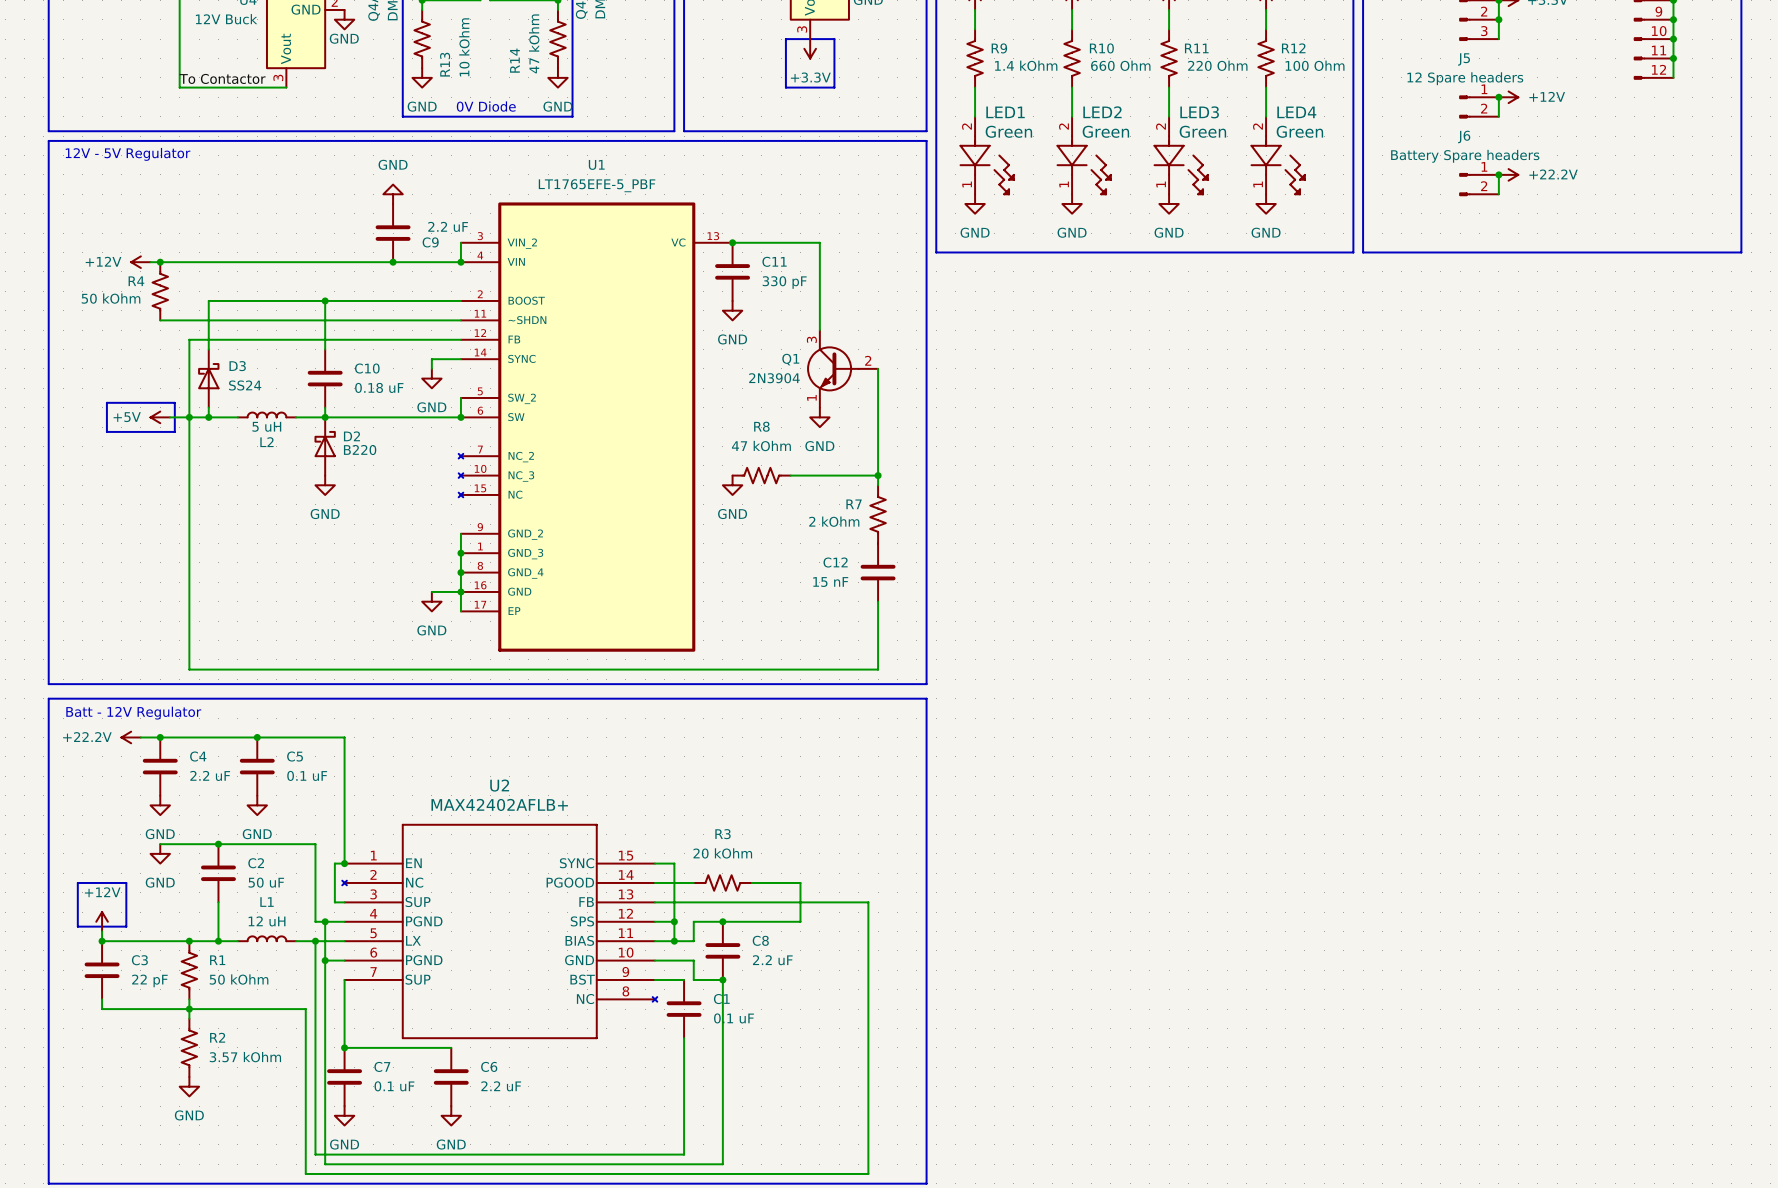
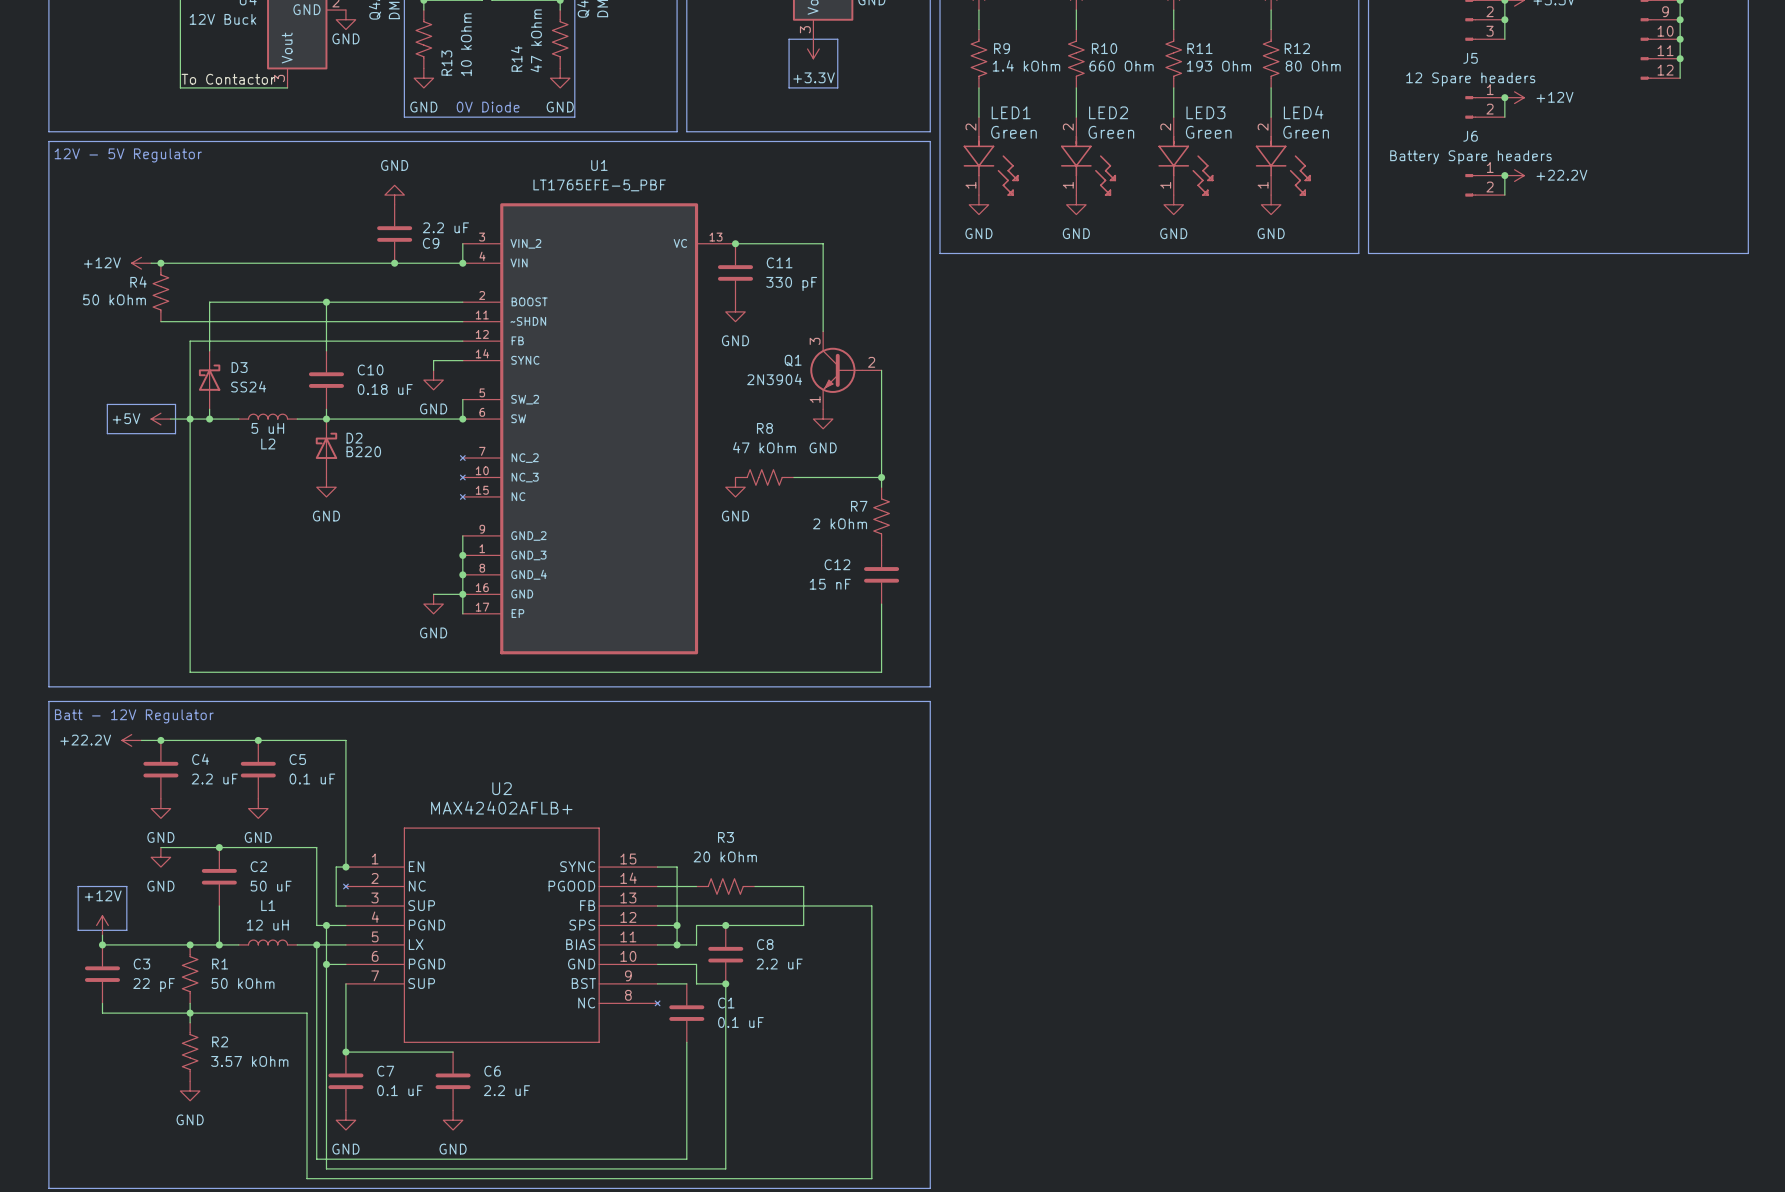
R11 value: 220 Ohm (1217, 65) -> 193 Ohm (1218, 66)
R12 value: 100 Ohm (1315, 65) -> 80 Ohm (1313, 66)

